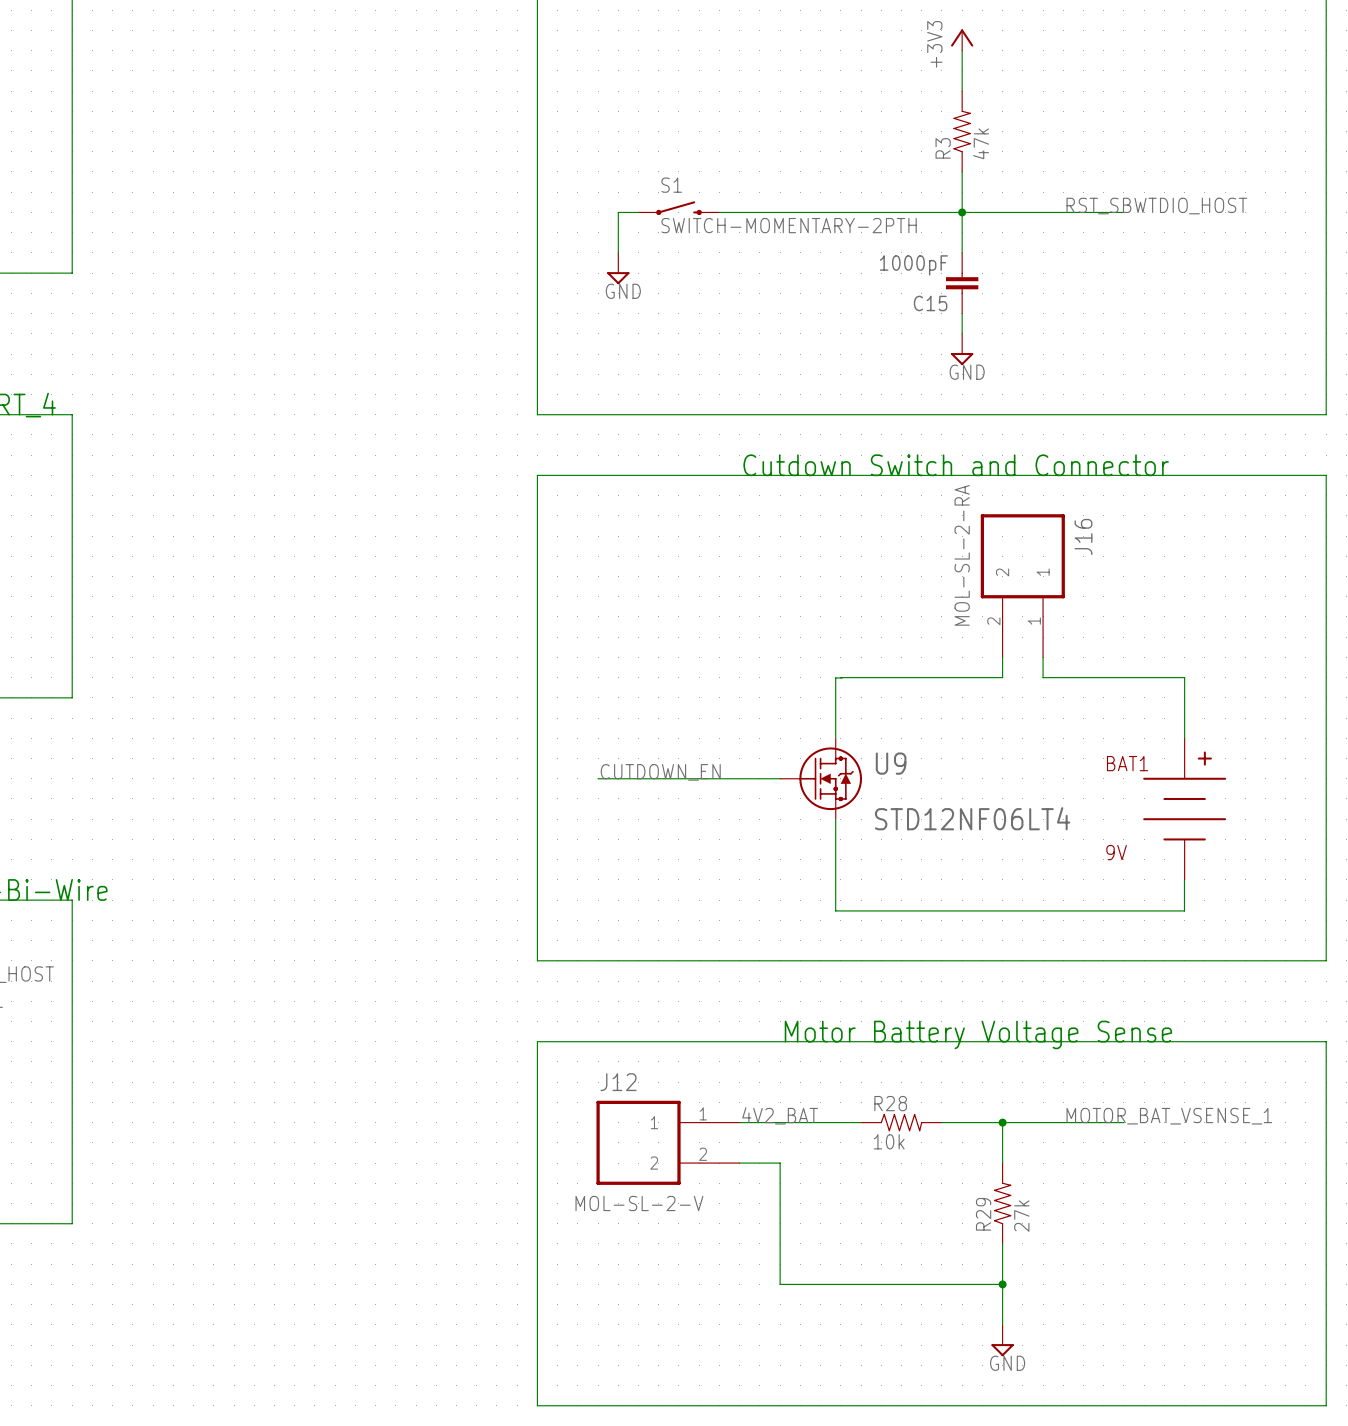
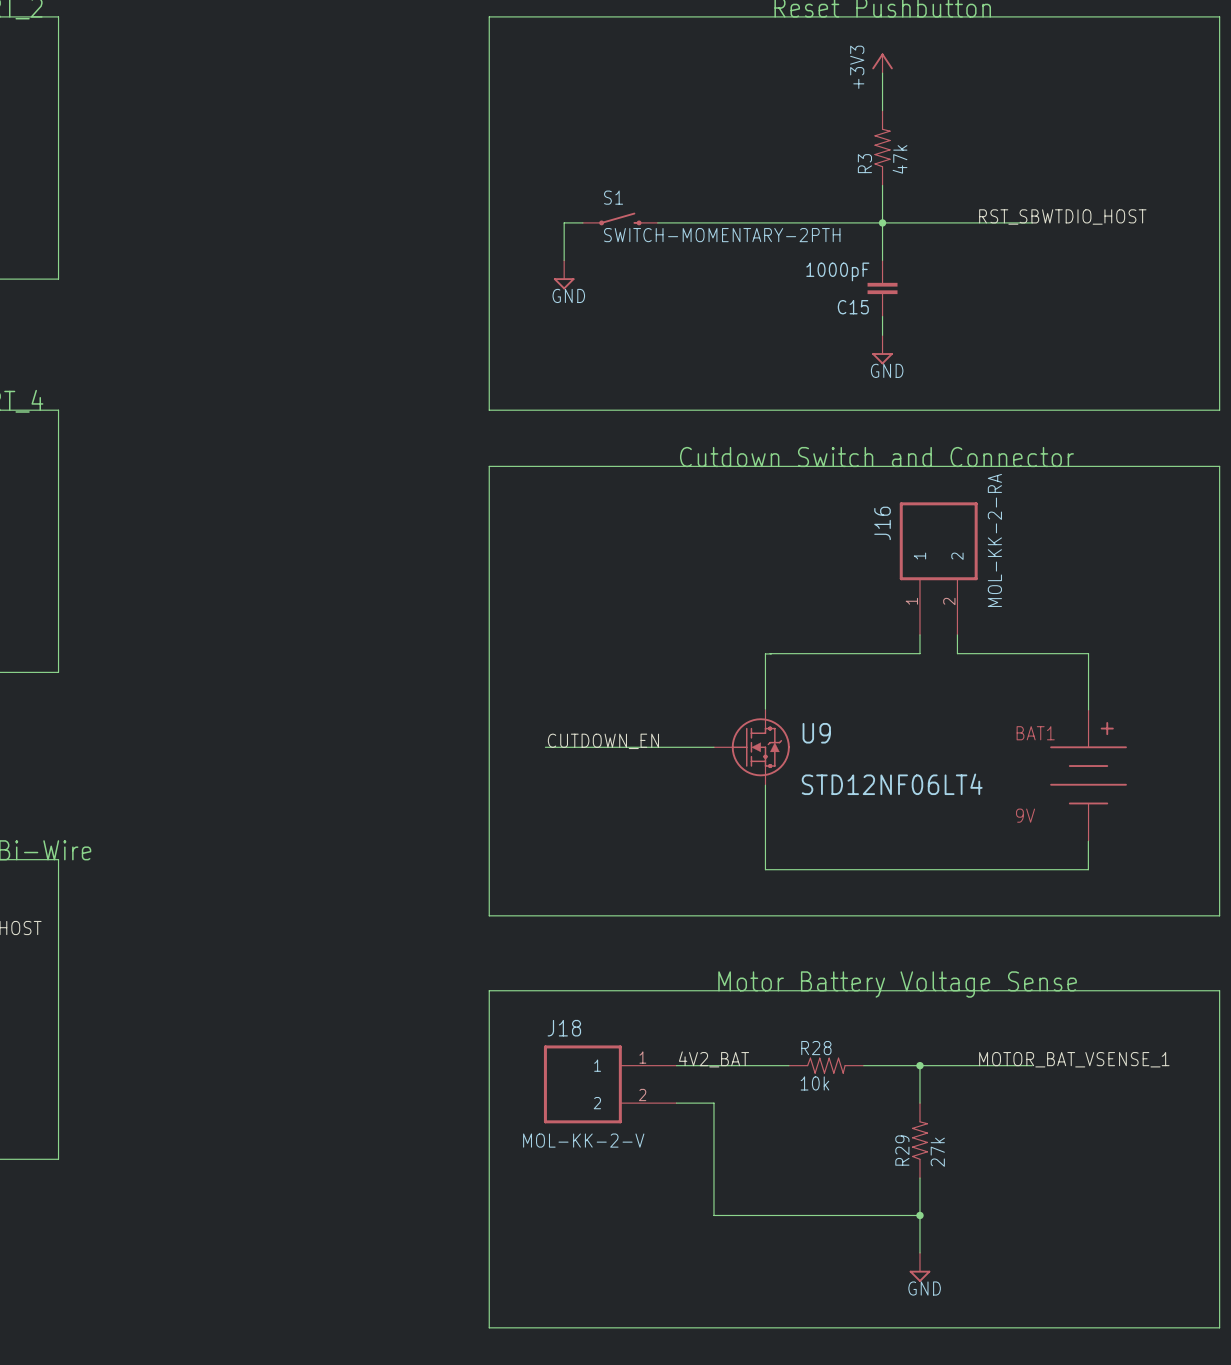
J16 value: MOL-SL-2-RA (962, 555) -> MOL-KK-2-RA (994, 540)
J16 flip: as is (1022, 556) -> left-right (938, 541)
J12 name: J12 (618, 1082) -> J18 (564, 1028)
J12 value: MOL-SL-2-V (639, 1203) -> MOL-KK-2-V (583, 1140)

